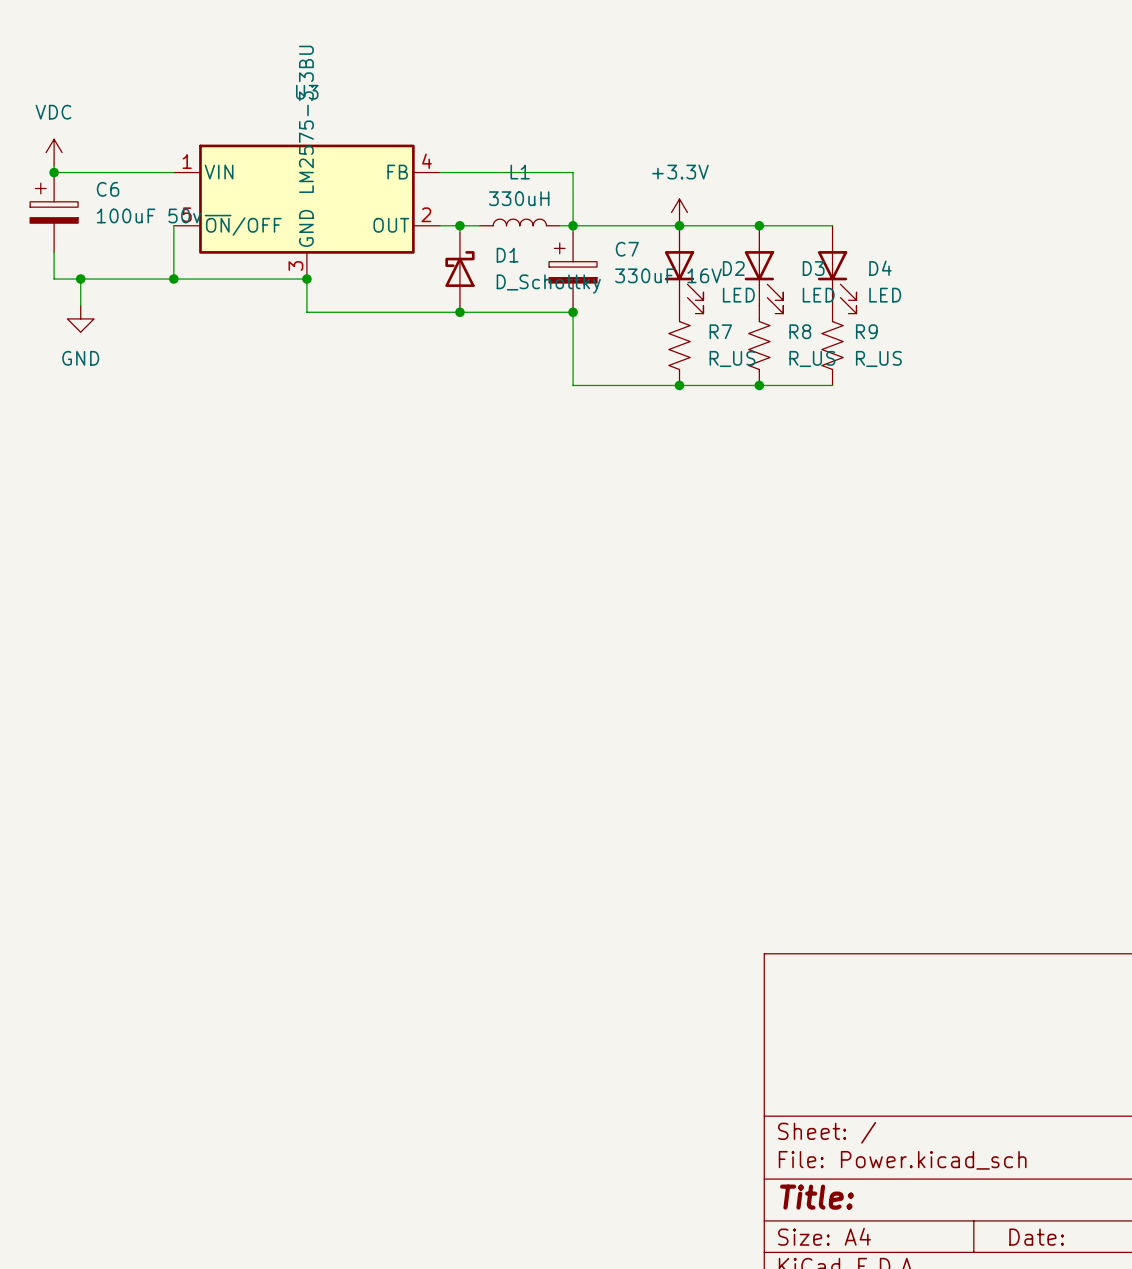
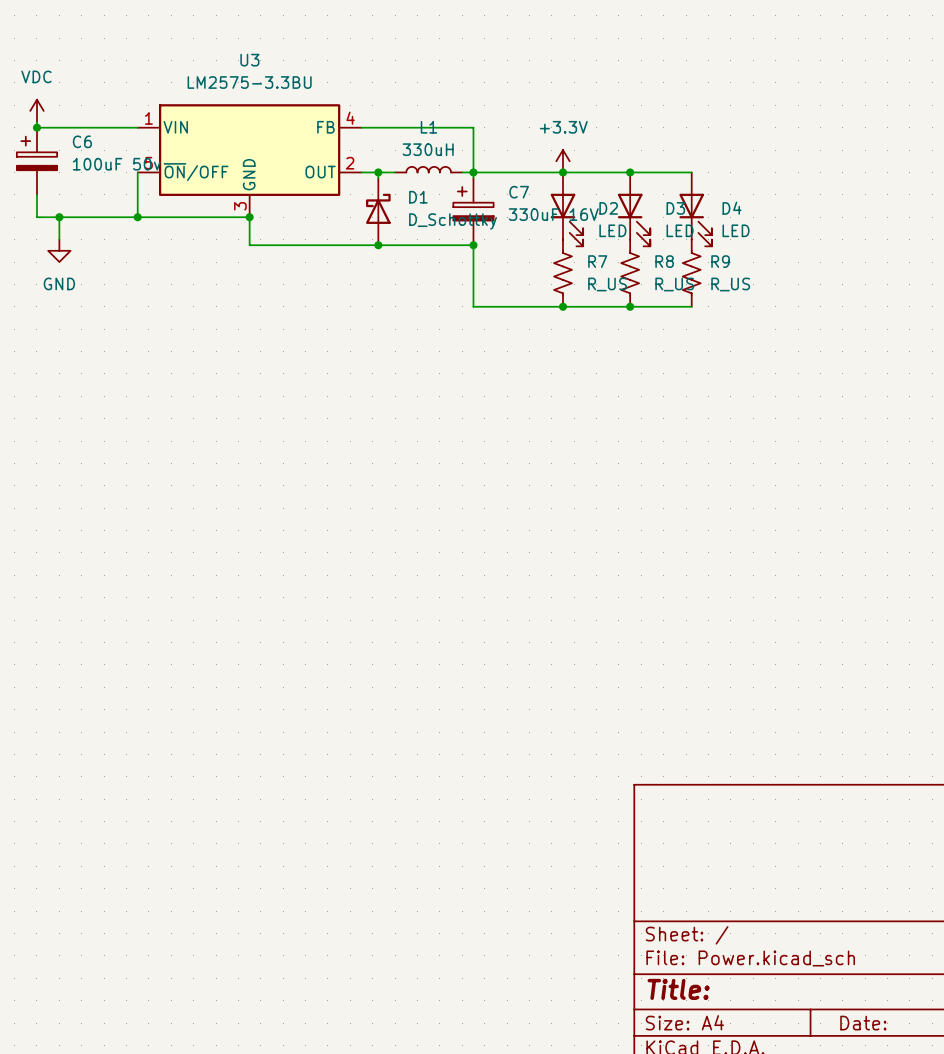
U3 value rotation: 0° (306, 119) -> 90° clockwise (249, 82)

